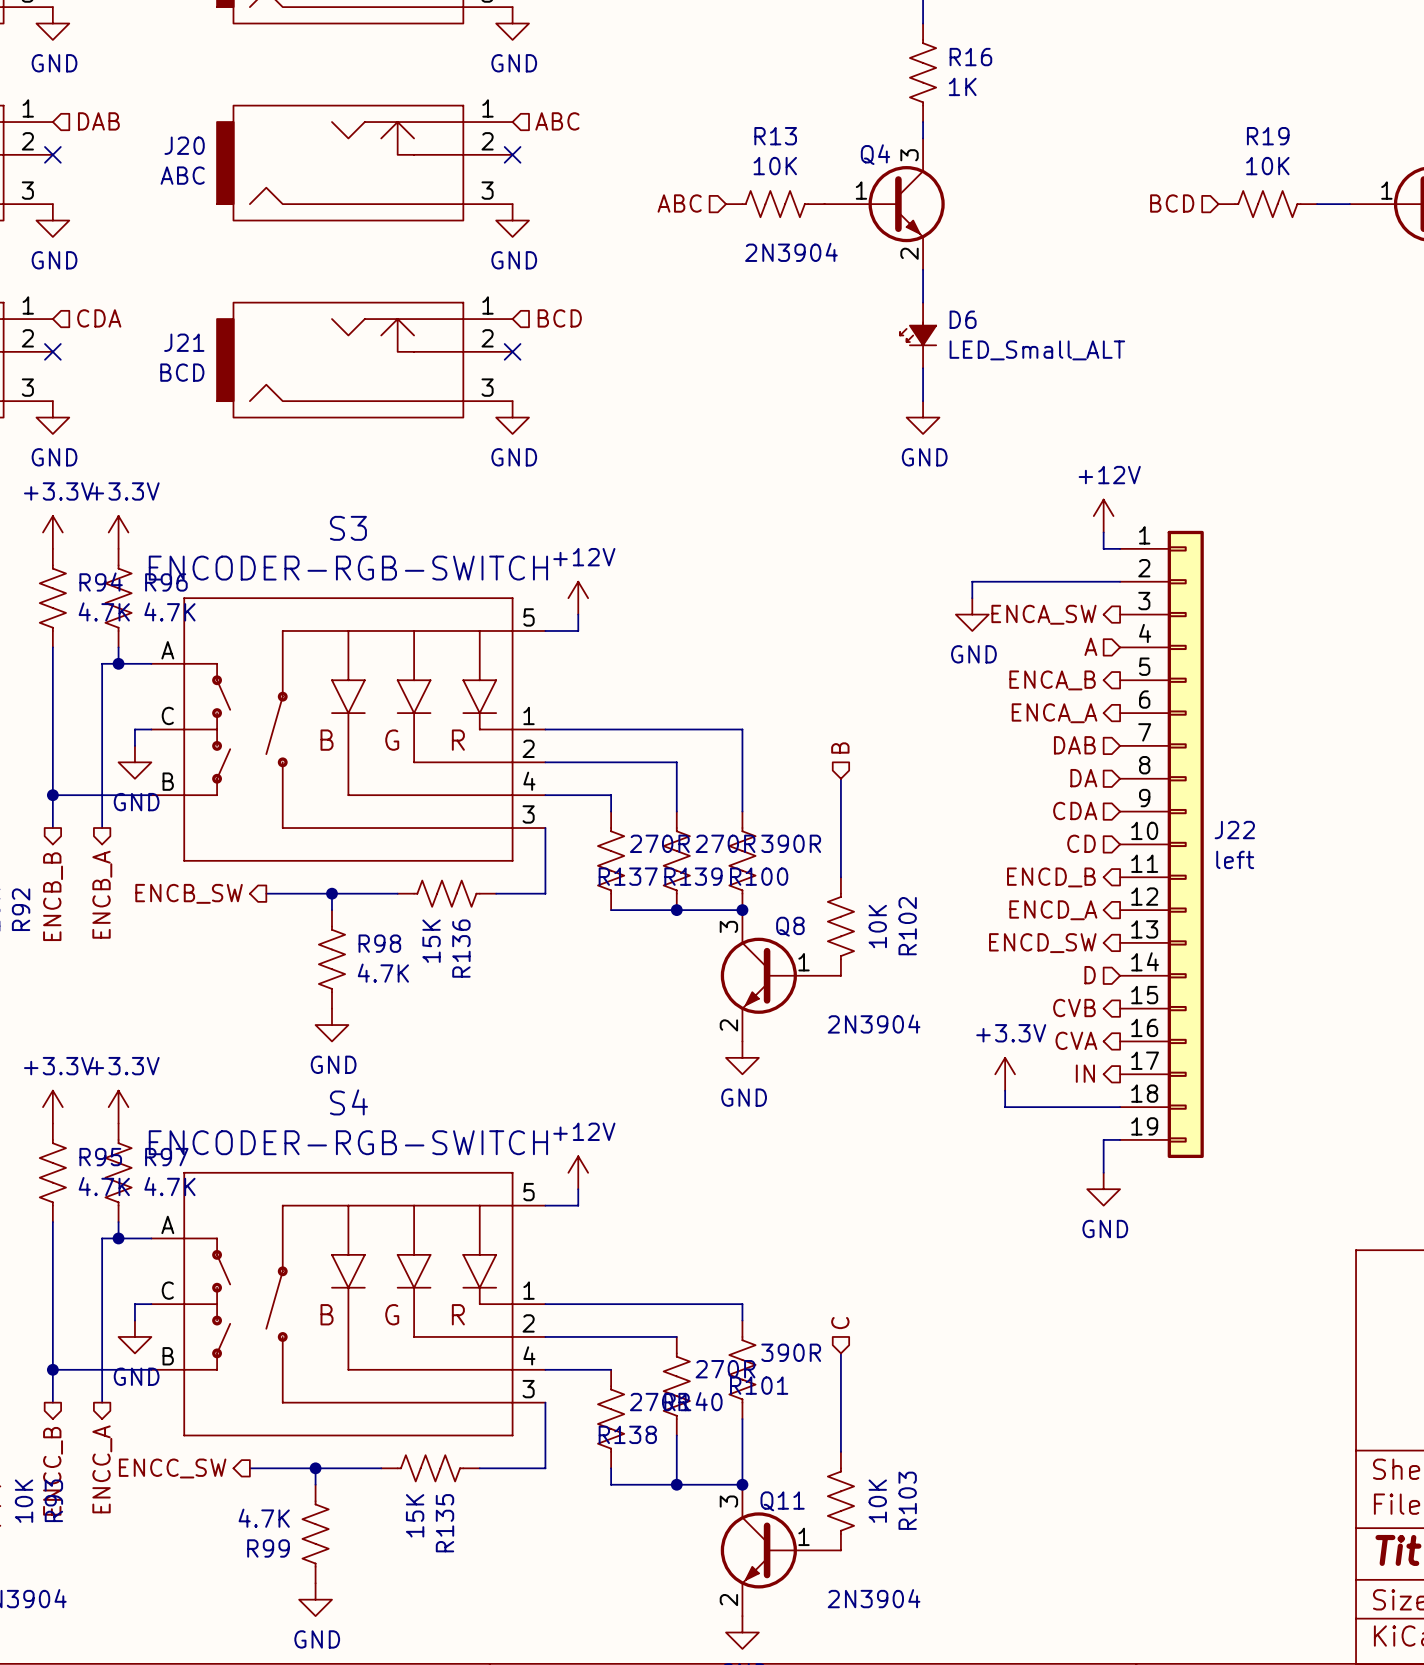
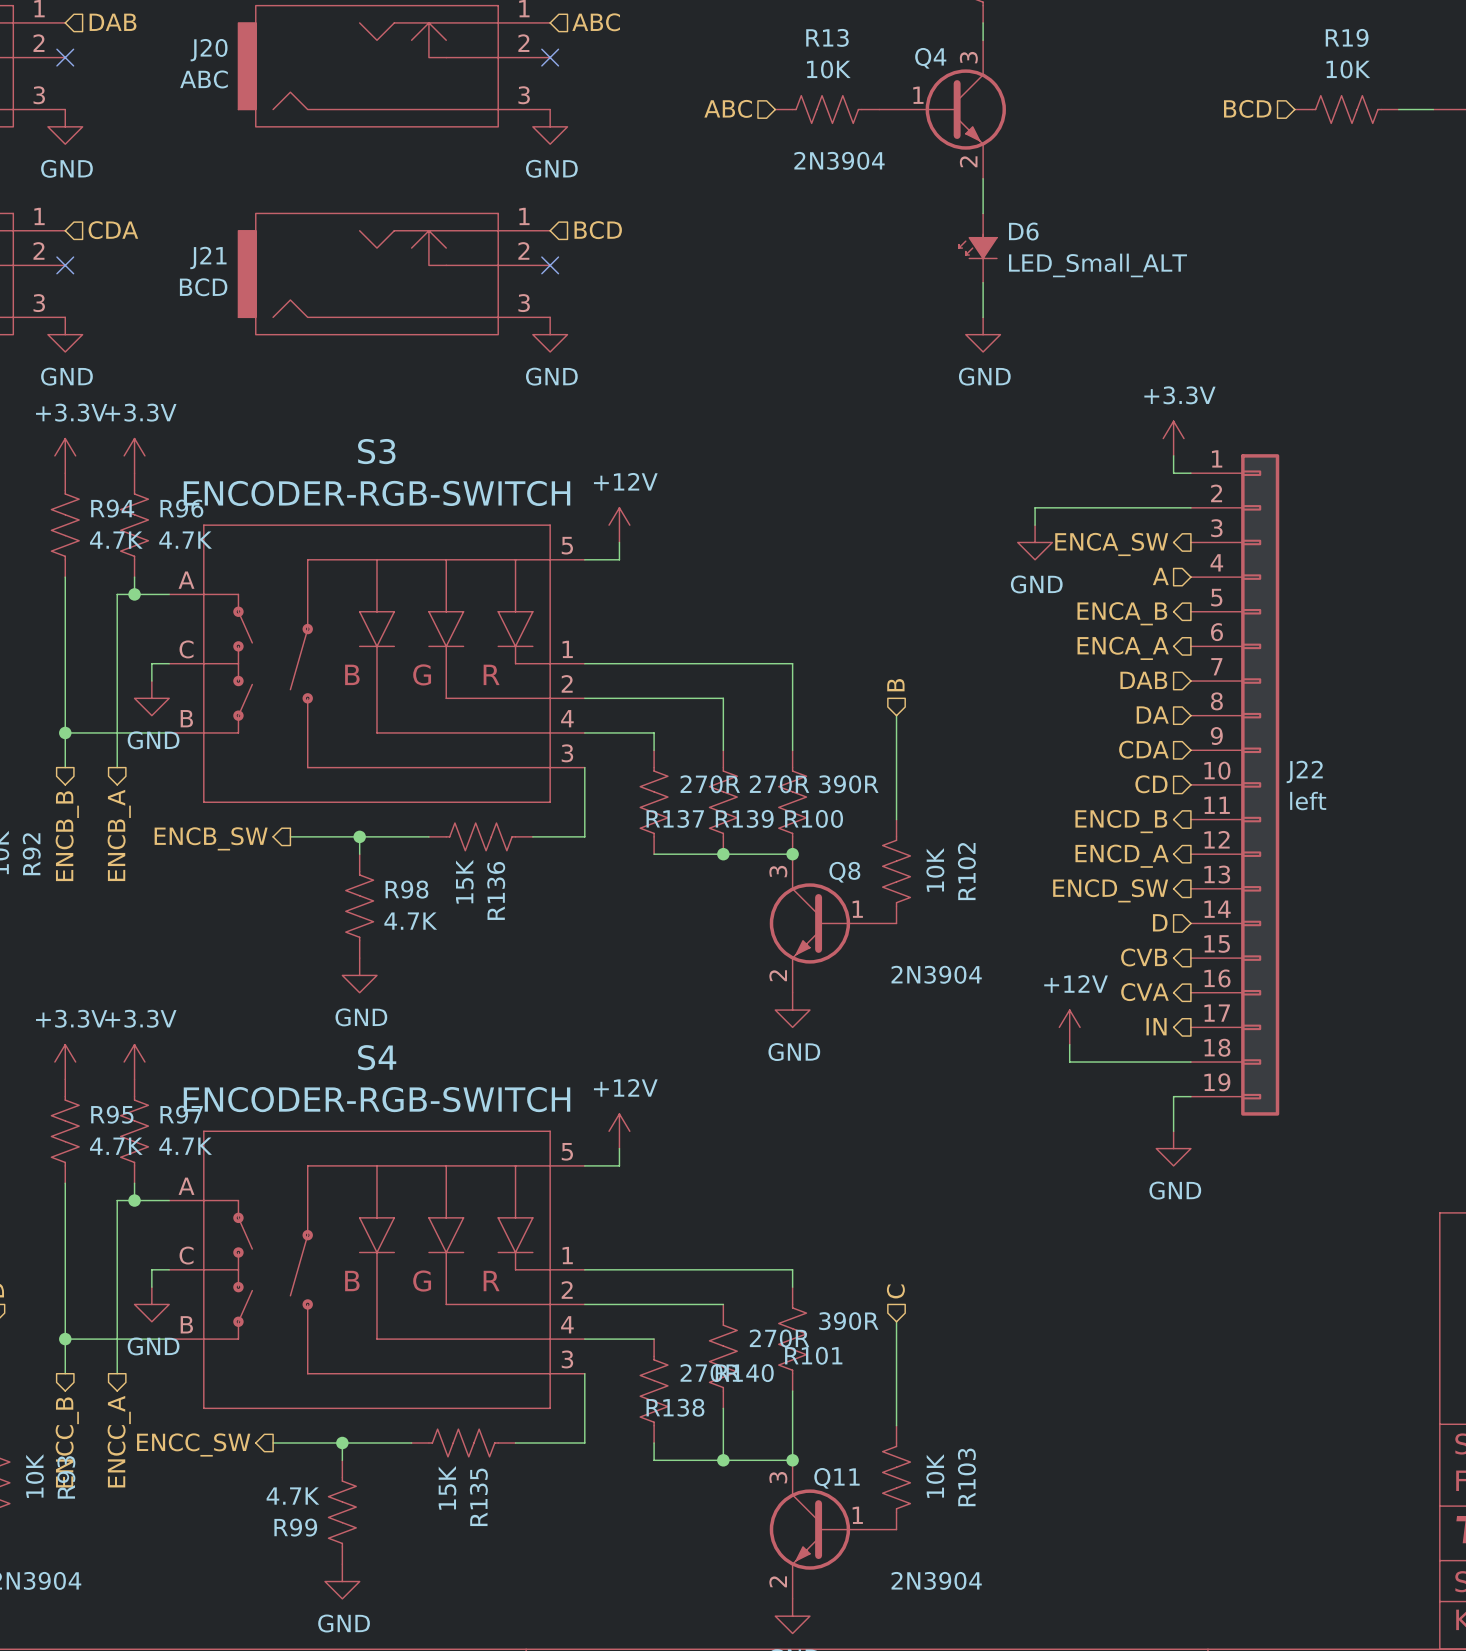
power symbol: +12V (1103, 516) -> +3.3V (1173, 438)
power symbol: +3.3V (1005, 1074) -> +12V (1069, 1027)

